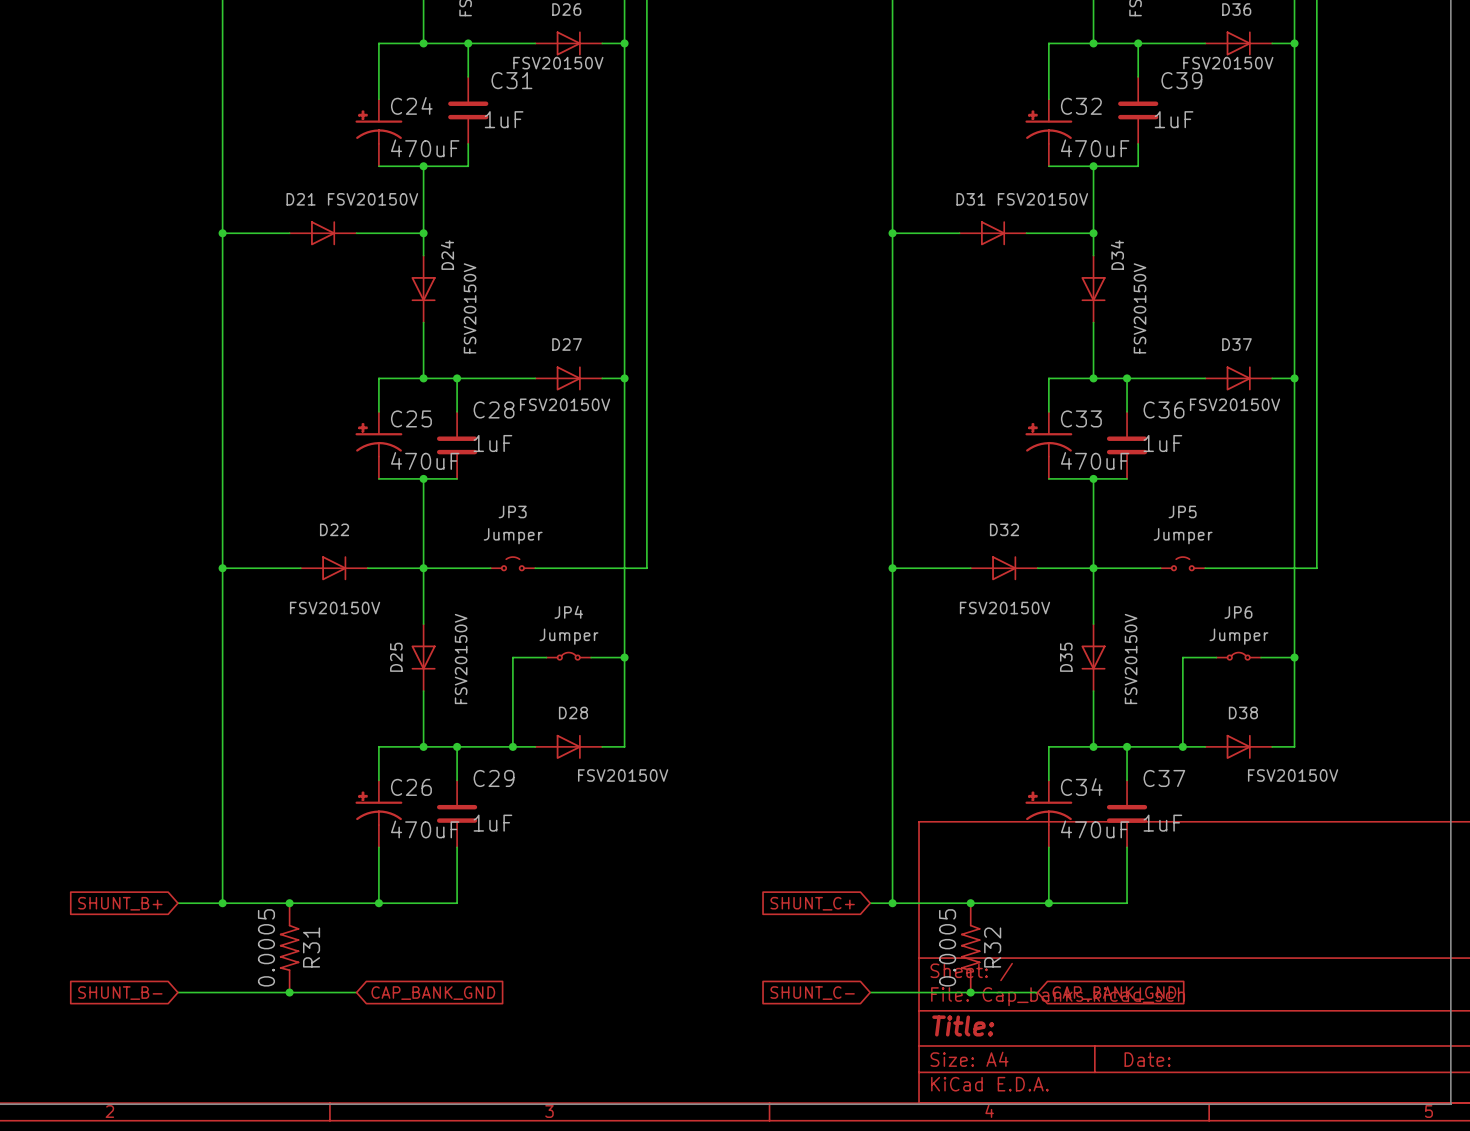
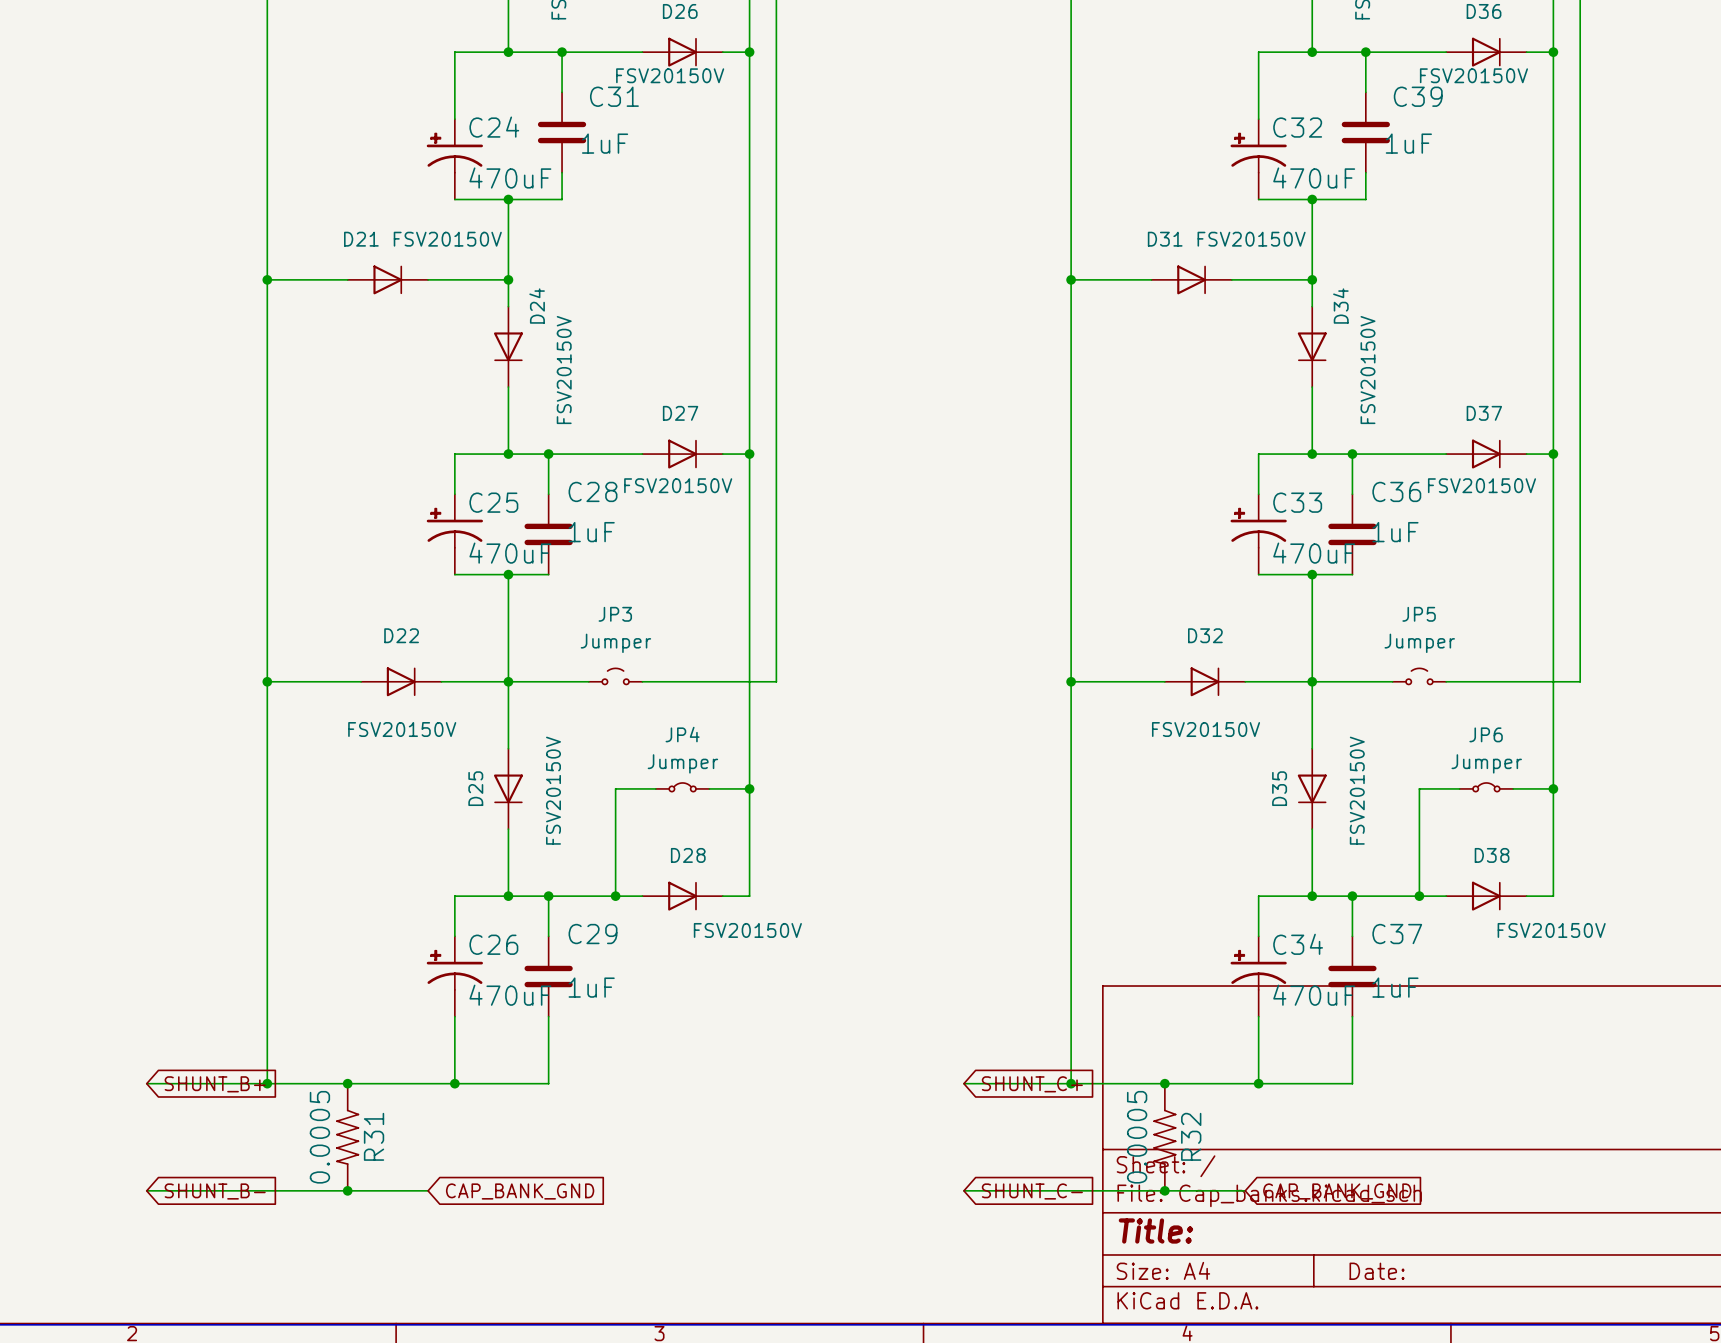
global label rotation: 0° (120, 903) -> 180° (215, 1084)
wire: none -> (146, 1083) (213, 1083)
wire: none -> (963, 1083) (1044, 1083)
global label rotation: 0° (812, 903) -> 180° (1032, 1084)
wire: none -> (146, 1190) (213, 1190)
wire: none -> (963, 1190) (1044, 1190)
global label rotation: 0° (120, 993) -> 180° (215, 1191)
global label rotation: 0° (812, 993) -> 180° (1032, 1191)

